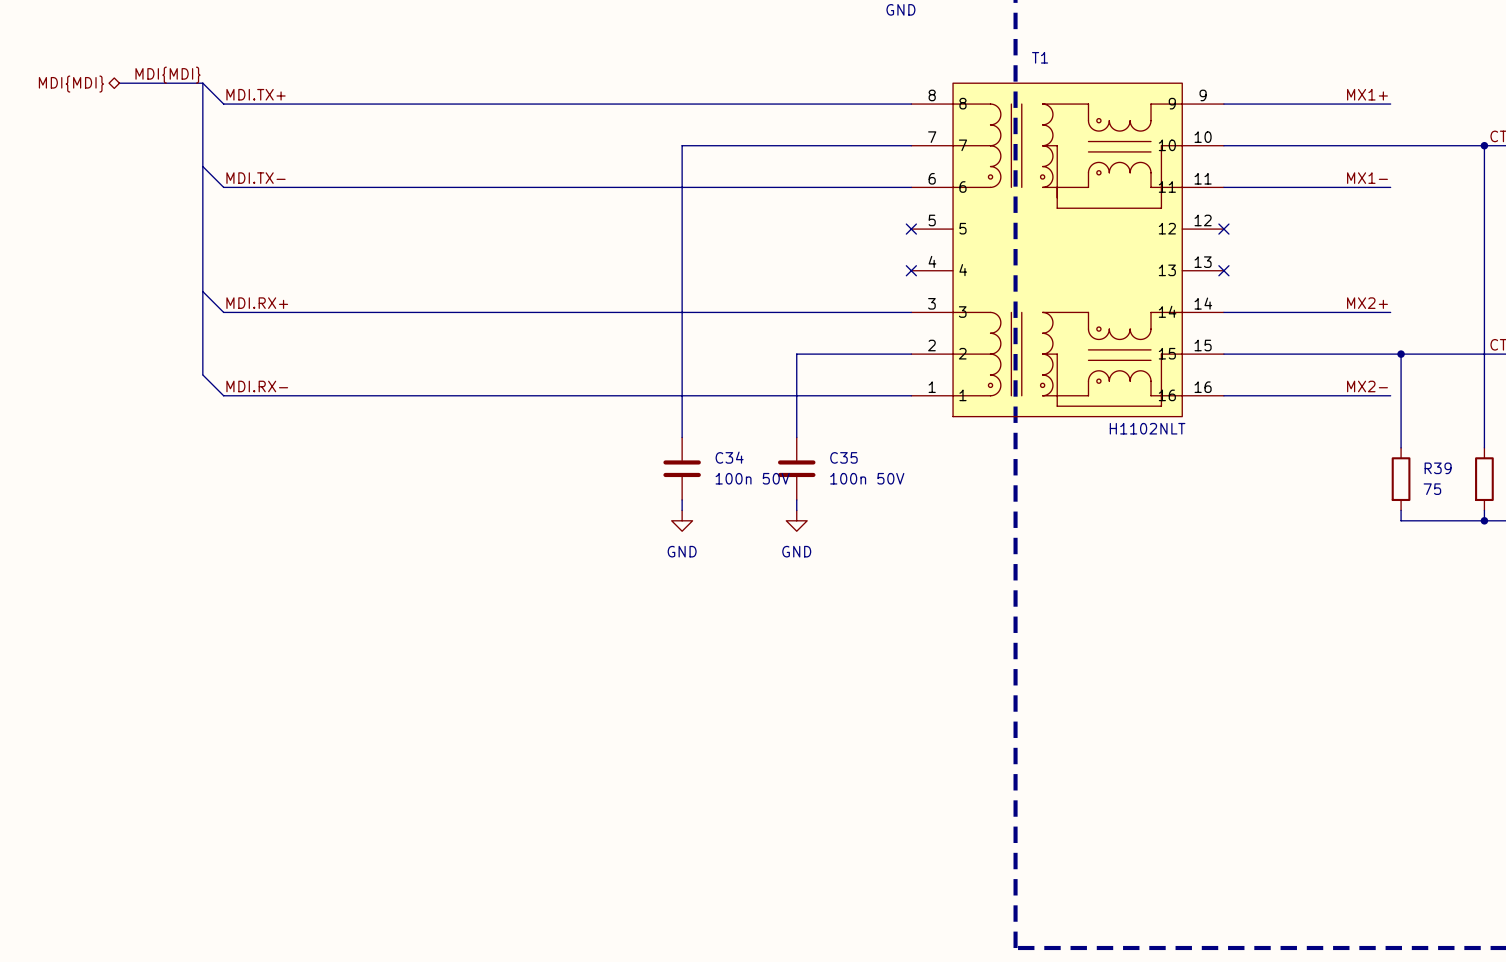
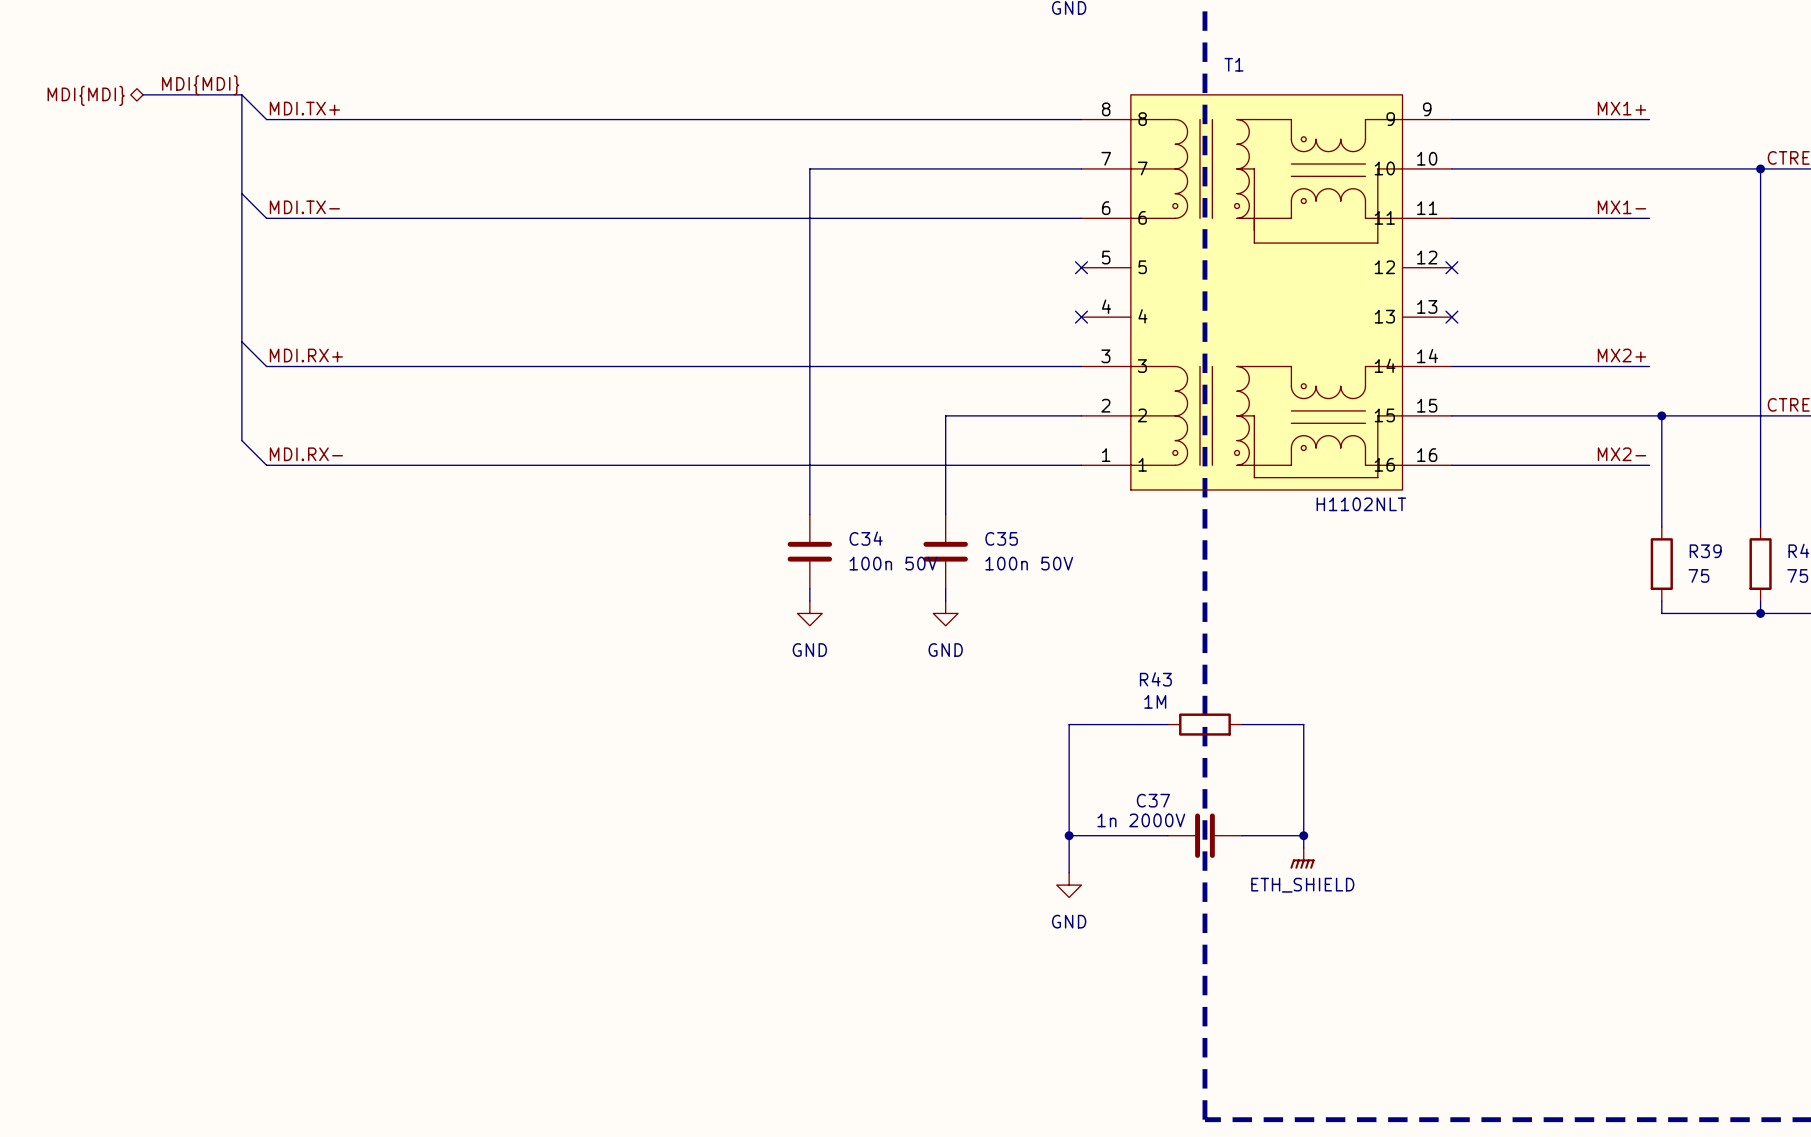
wire: none -> (1167, 724) (1069, 724) (1069, 872)
R43: none -> 1M (1204, 724)
wire: none -> (1242, 724) (1303, 724) (1303, 848)
wire: none -> (1069, 835) (1167, 835)
junction: none -> (1069, 835)
C37: none -> 1n 2000V (1204, 835)
wire: none -> (1242, 835) (1303, 835)
junction: none -> (1303, 835)
power symbol: none -> ETH_SHIELD (1302, 858)
power symbol: none -> GND (1069, 885)

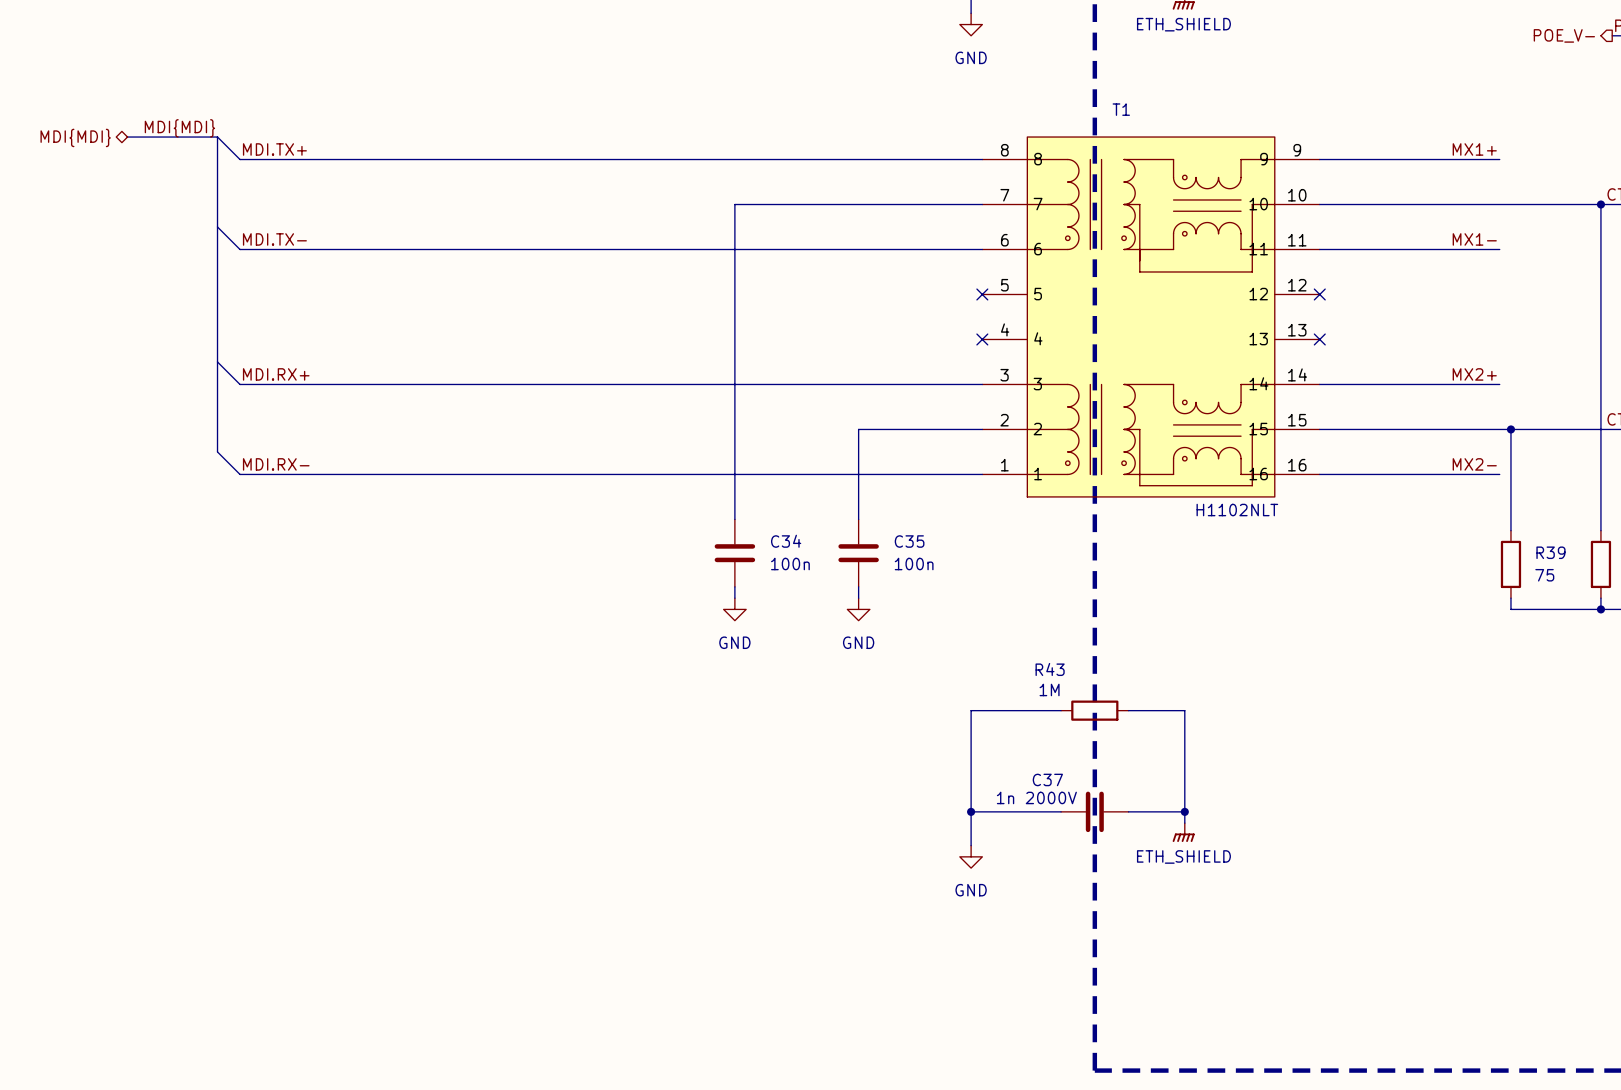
C34 value: 100n 50V (893, 563) -> 100n (790, 564)
C35 value: 100n 50V (1029, 563) -> 100n (914, 564)

